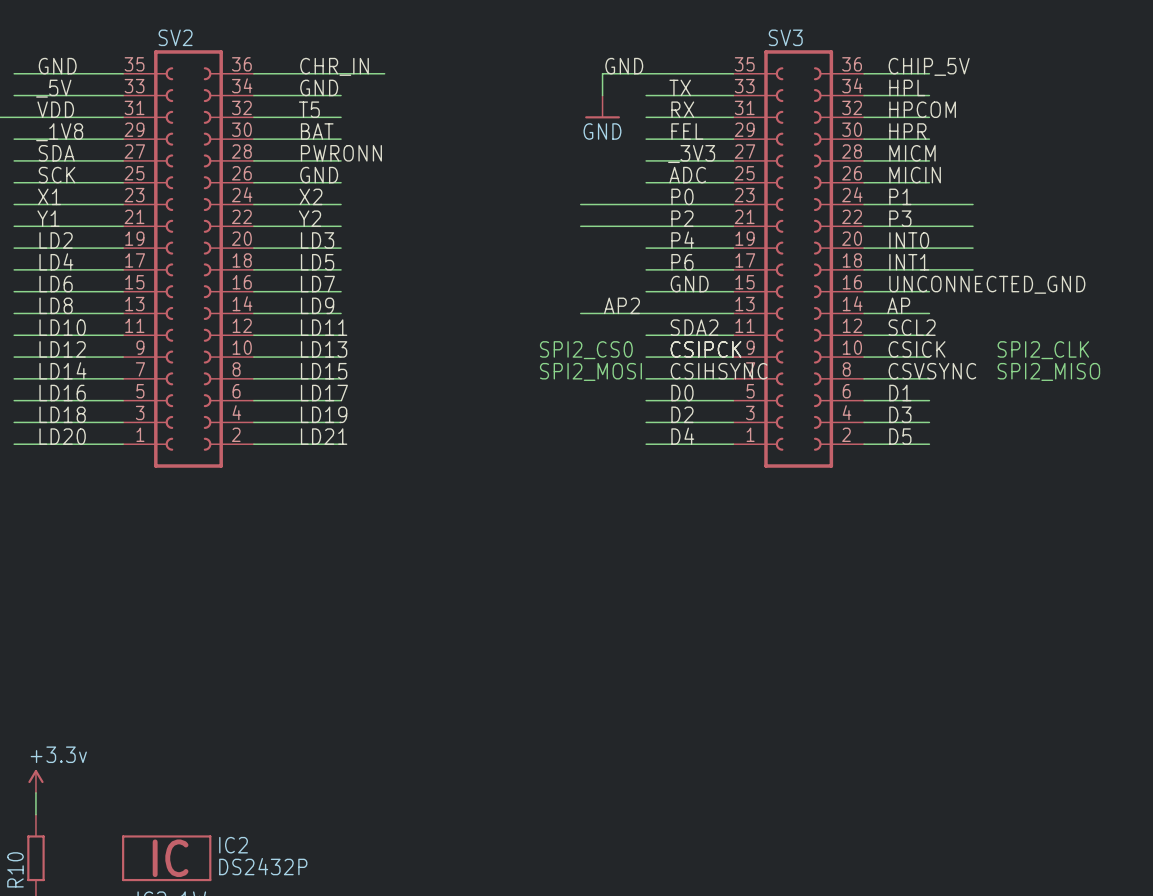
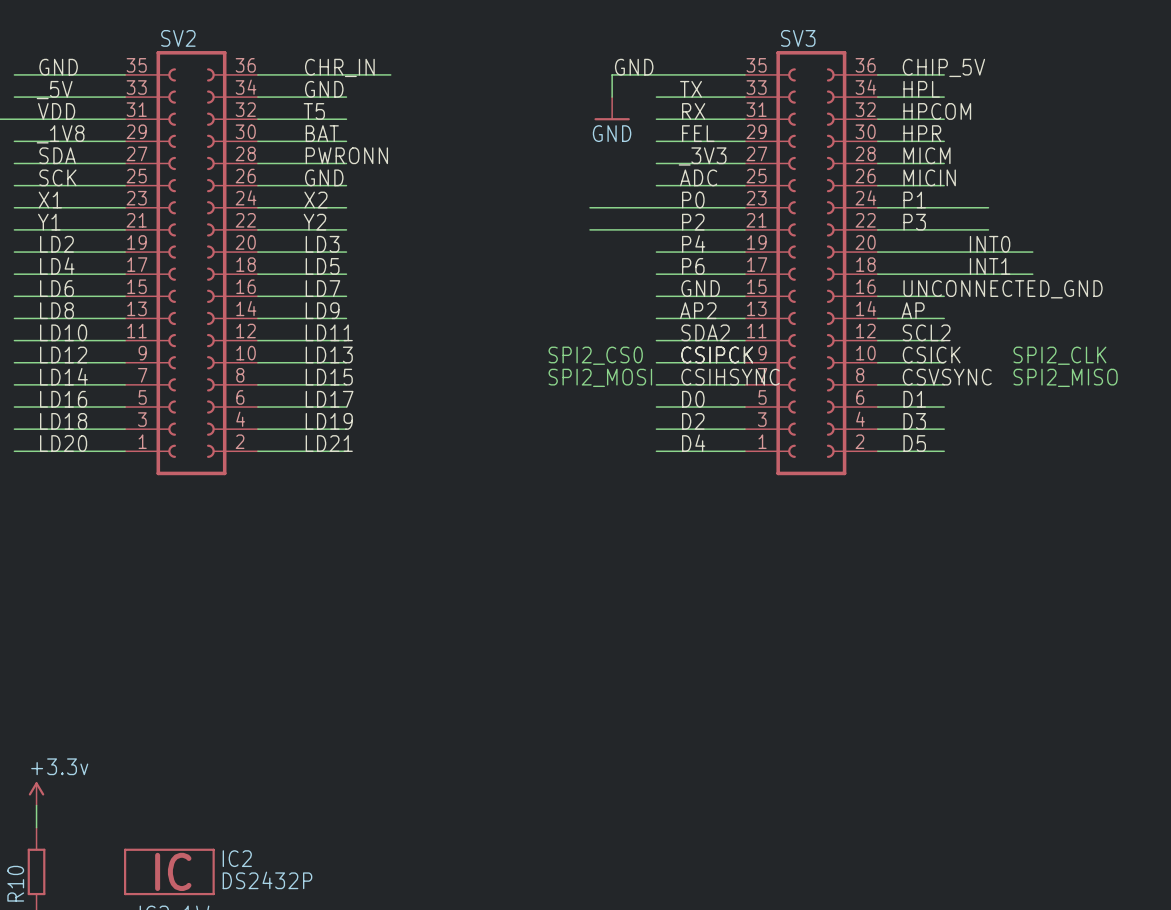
label position: INT0 (909, 240) -> INT0 (990, 244)
wire: none -> (988, 252) (1032, 252)
label position: INT1 (909, 262) -> INT1 (990, 266)
wire: none -> (988, 274) (1032, 274)
label position: AP2 (621, 305) -> AP2 (698, 310)
wire: (580, 313) (646, 313) -> none

